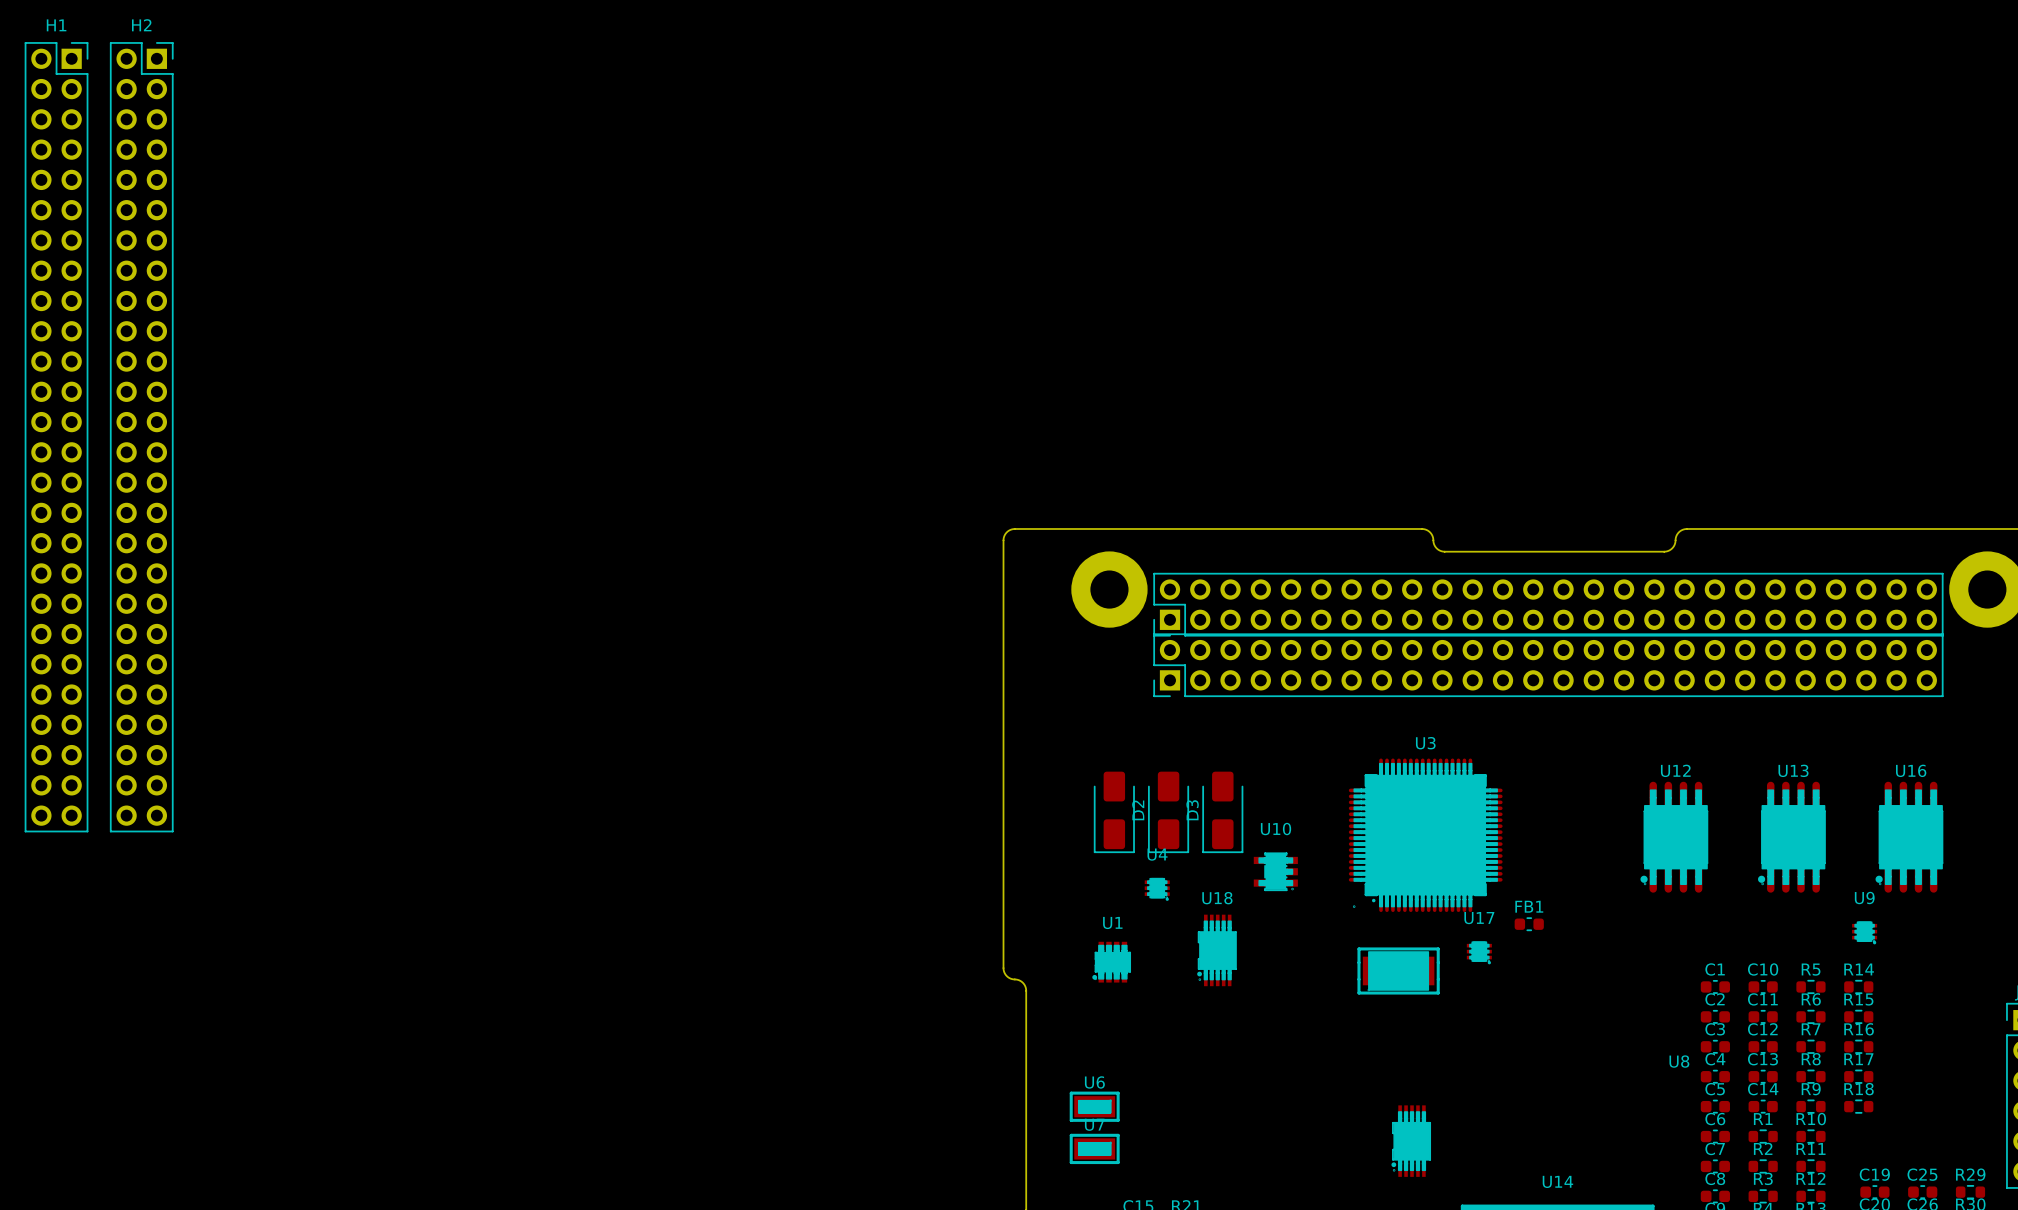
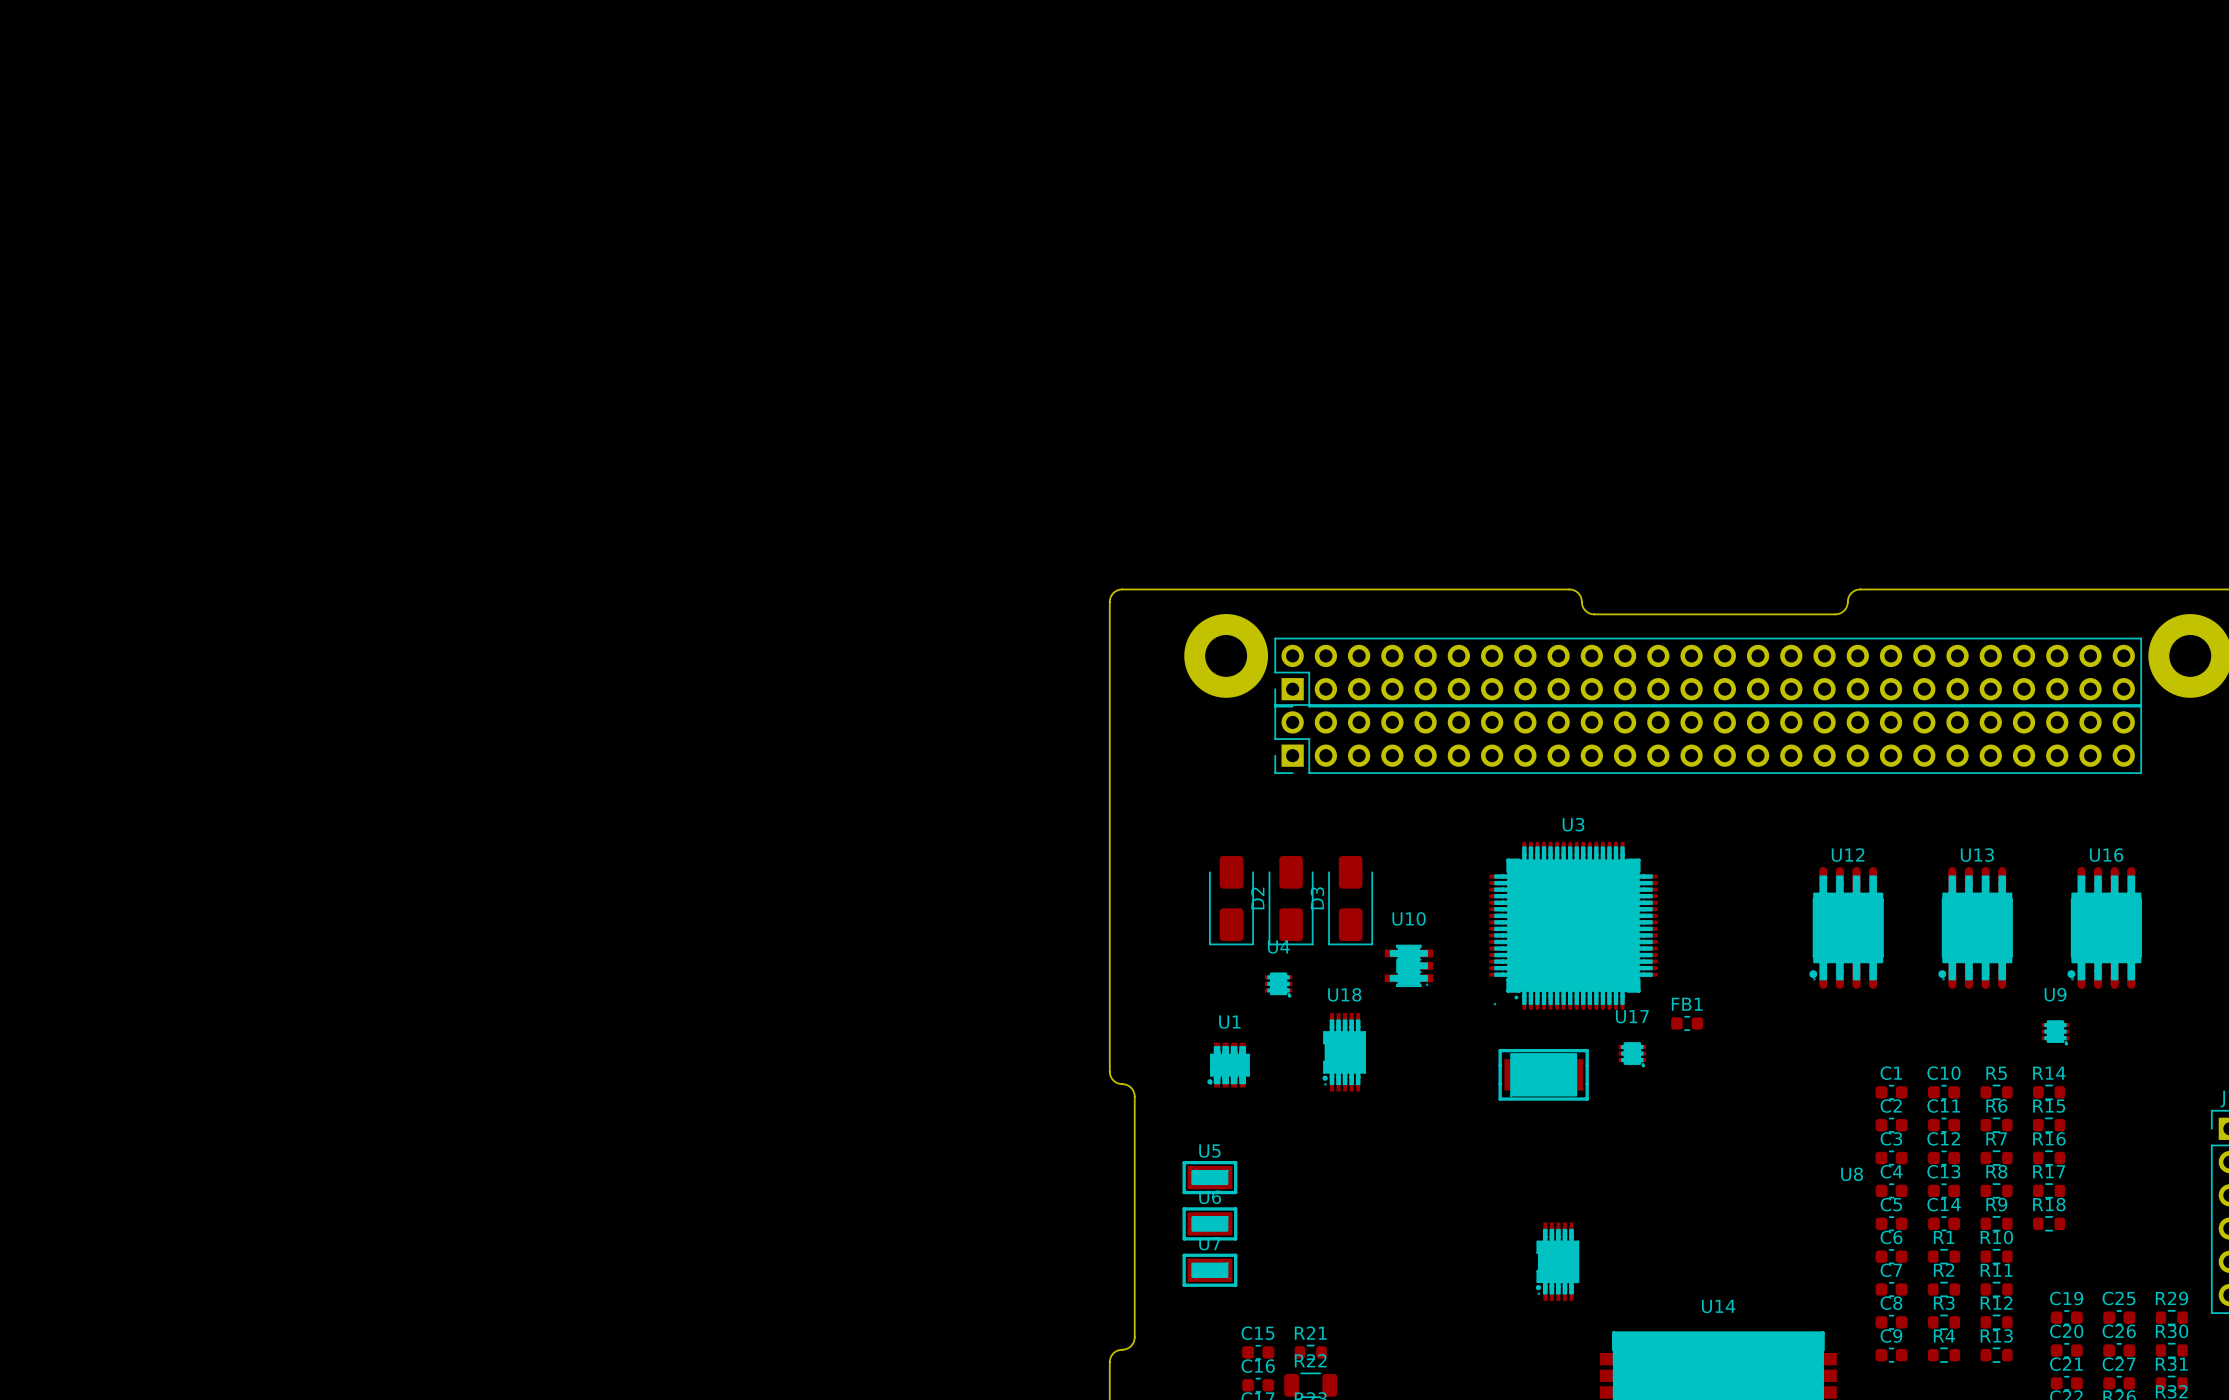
H1: (56, 437) -> none
H2: (141, 437) -> none
U5: none -> (1209, 1177)

